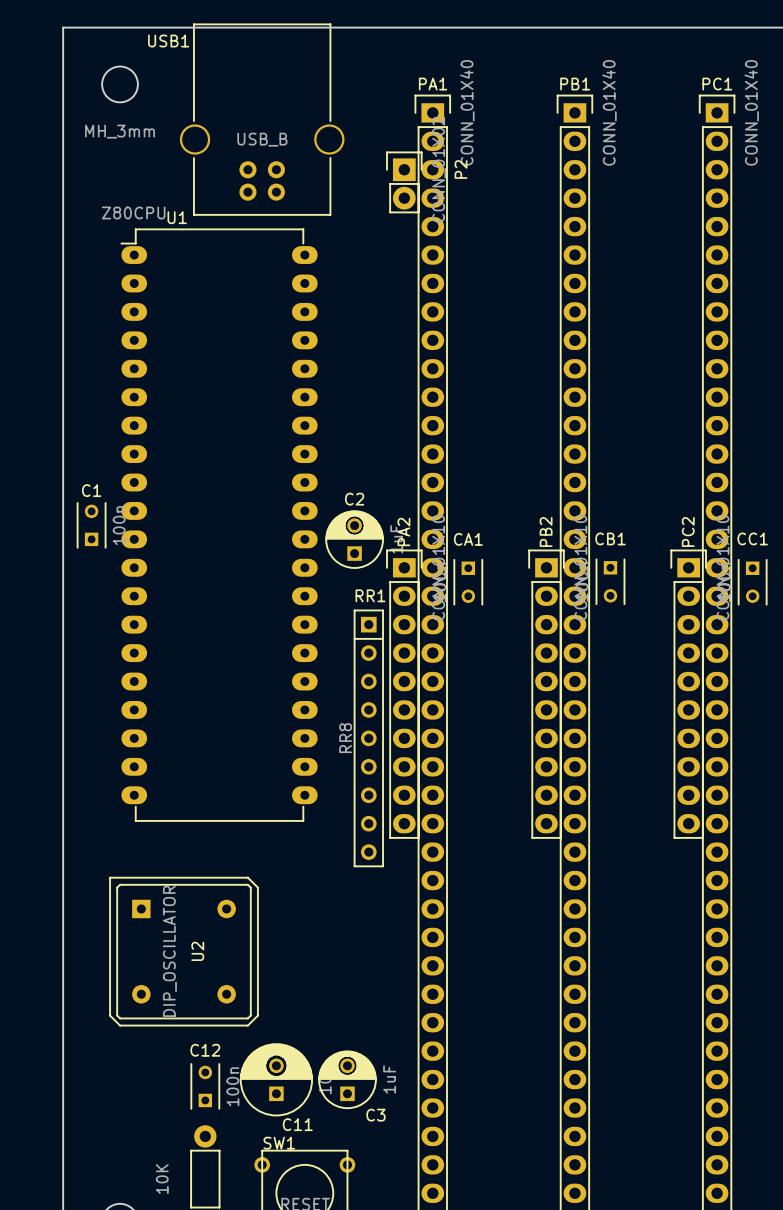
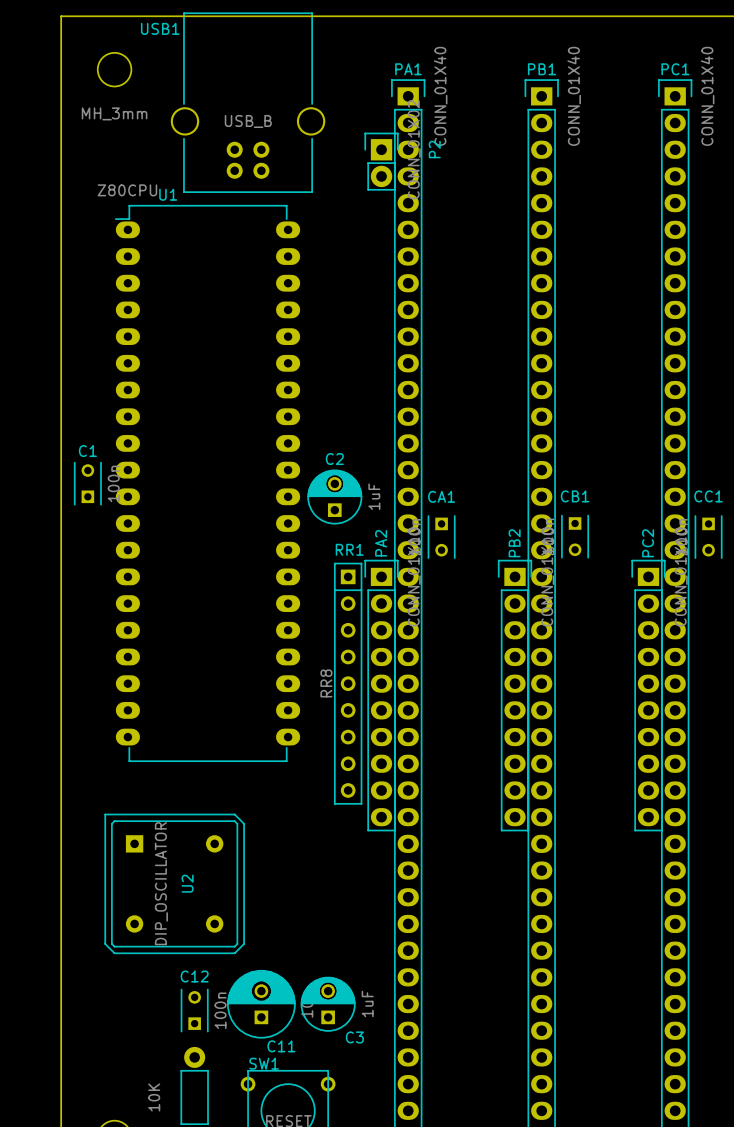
PA2 position: (404, 694) -> (381, 695)
PB2 position: (546, 694) -> (515, 695)
PC2 position: (688, 694) -> (648, 695)

